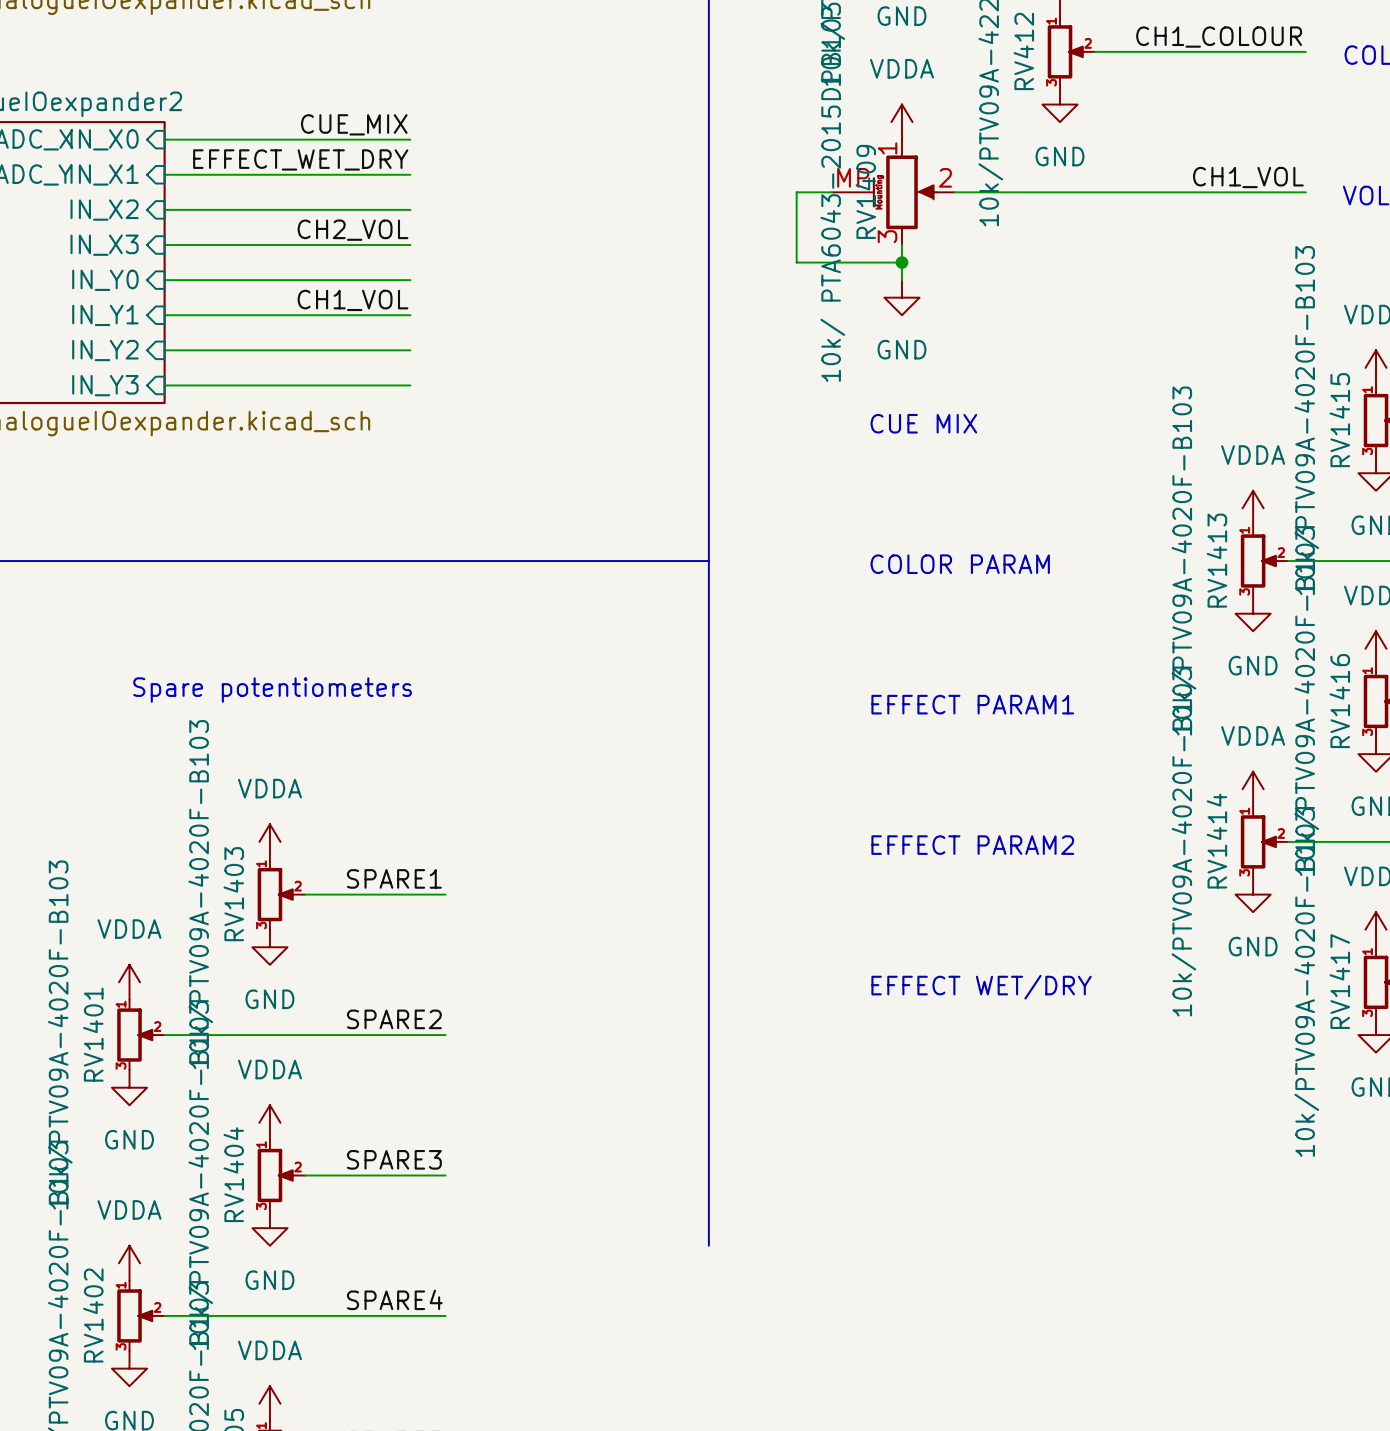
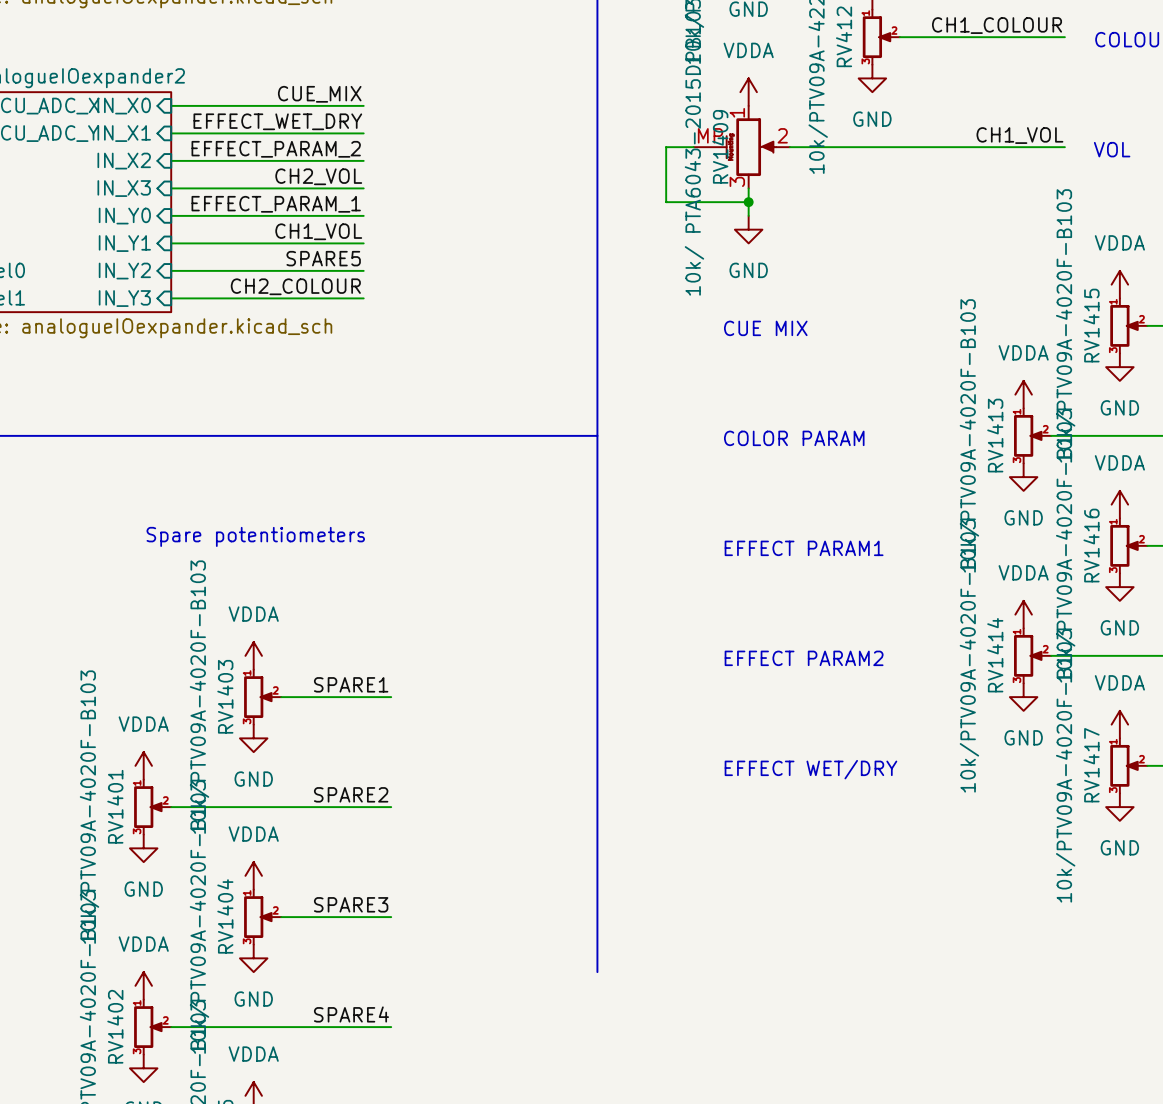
label: none -> EFFECT_PARAM_2 (276, 149)
label: none -> EFFECT_PARAM_1 (276, 204)
label: none -> SPARE5 (323, 258)
label: none -> CH2_COLOUR (295, 286)

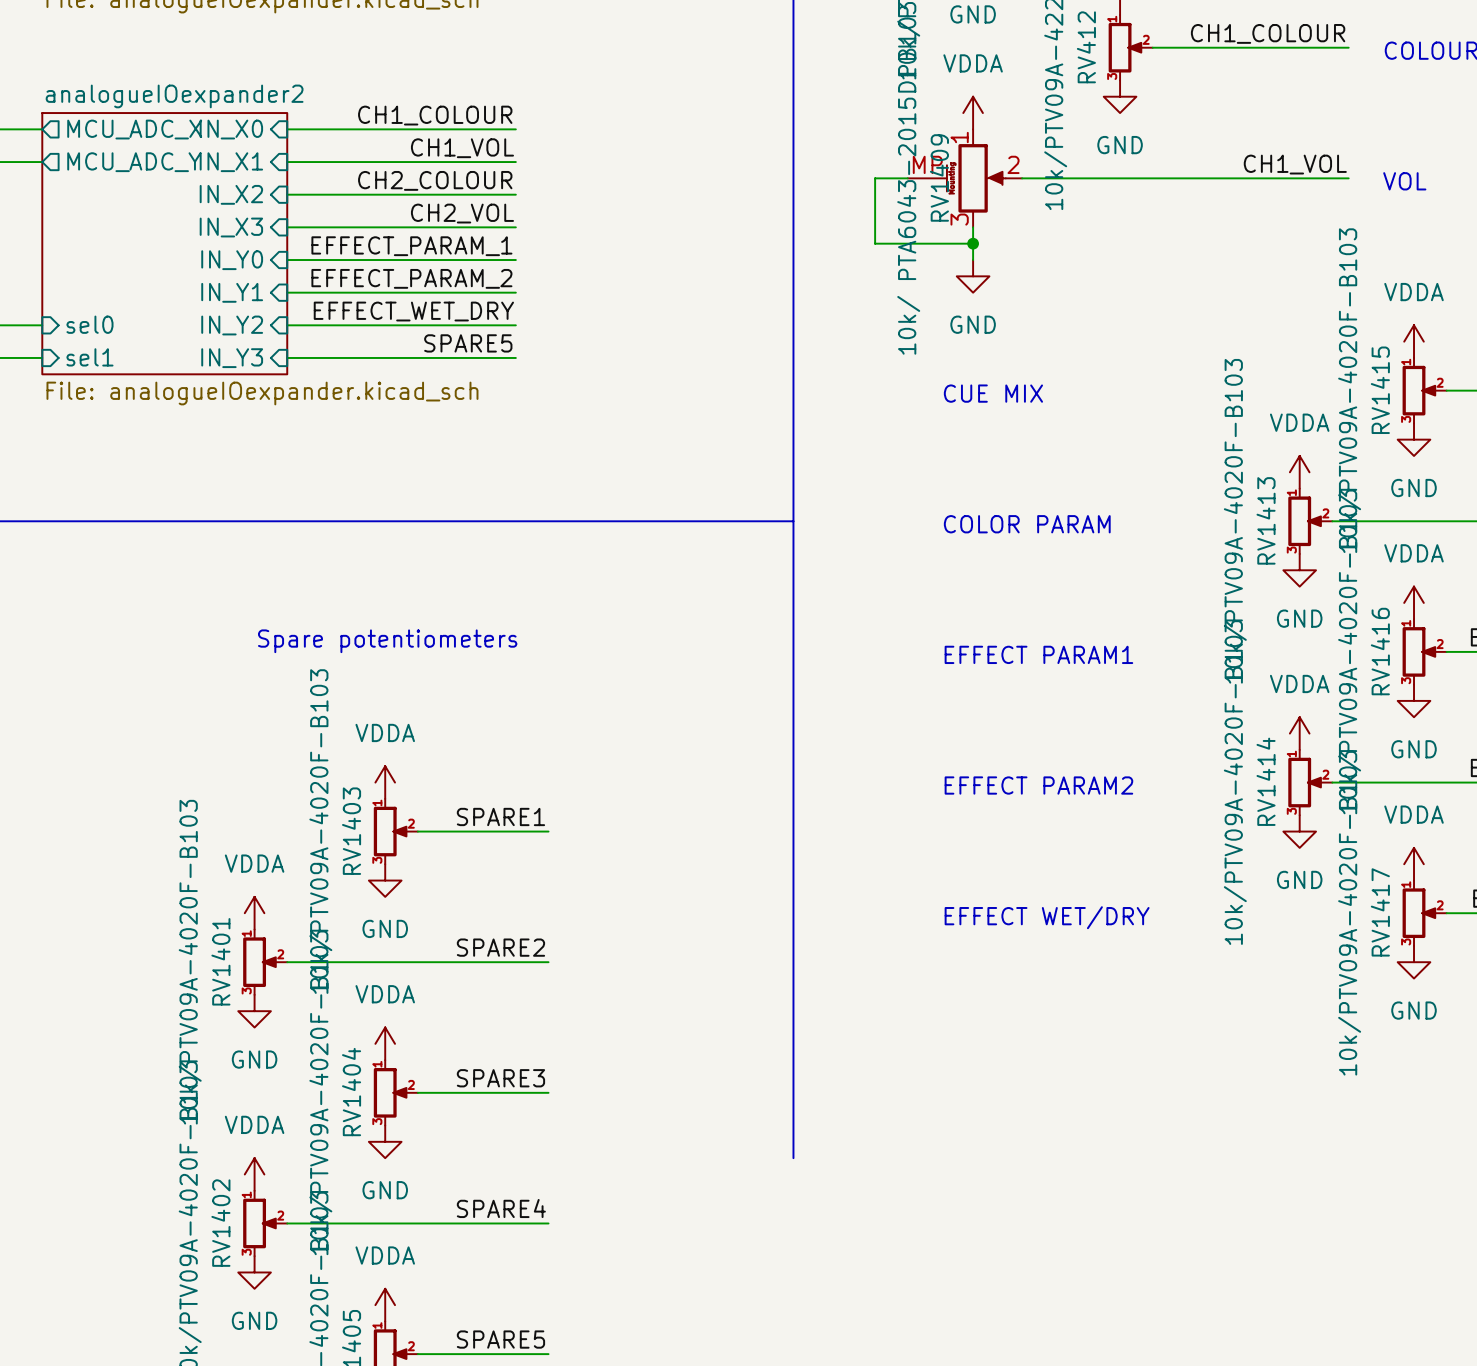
label: CUE_MIX (319, 94) -> CH1_COLOUR (435, 115)
label: EFFECT_WET_DRY (277, 121) -> CH1_VOL (462, 148)
label: EFFECT_PARAM_2 (276, 149) -> CH2_COLOUR (435, 180)
label: CH1_VOL (318, 231) -> EFFECT_PARAM_2 (411, 278)
label: SPARE5 (323, 258) -> EFFECT_WET_DRY (413, 311)
label: CH2_COLOUR (295, 286) -> SPARE5 (468, 343)

